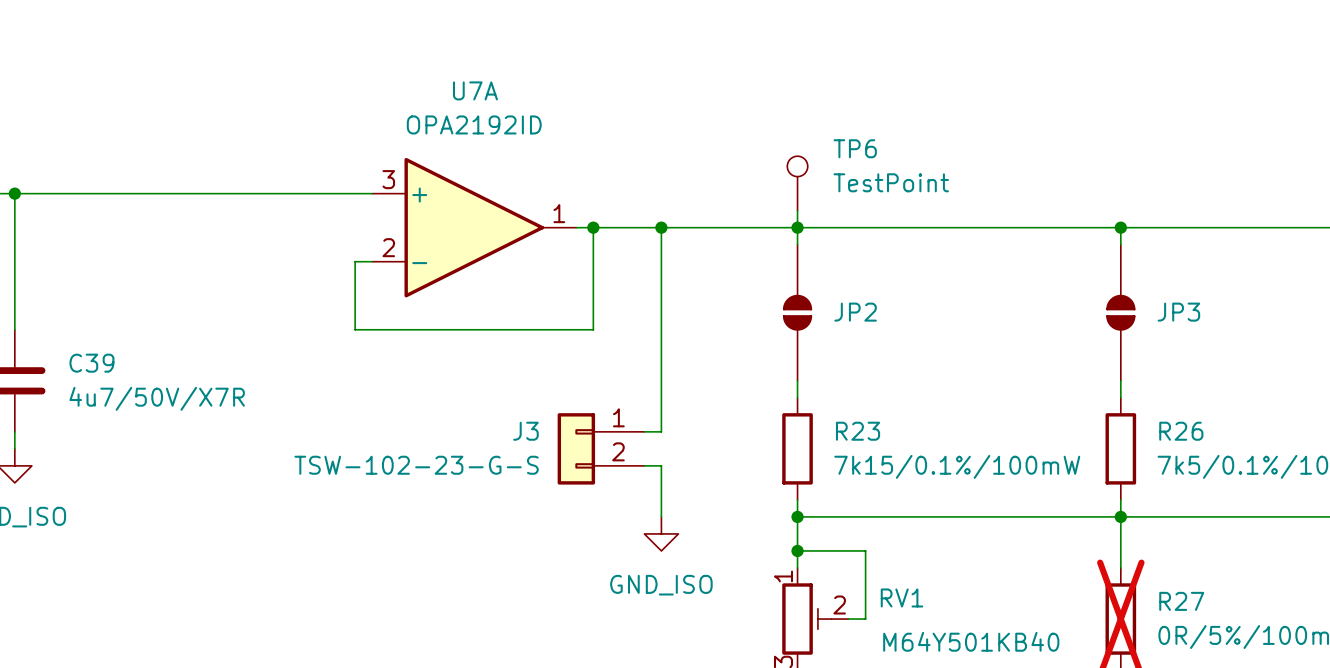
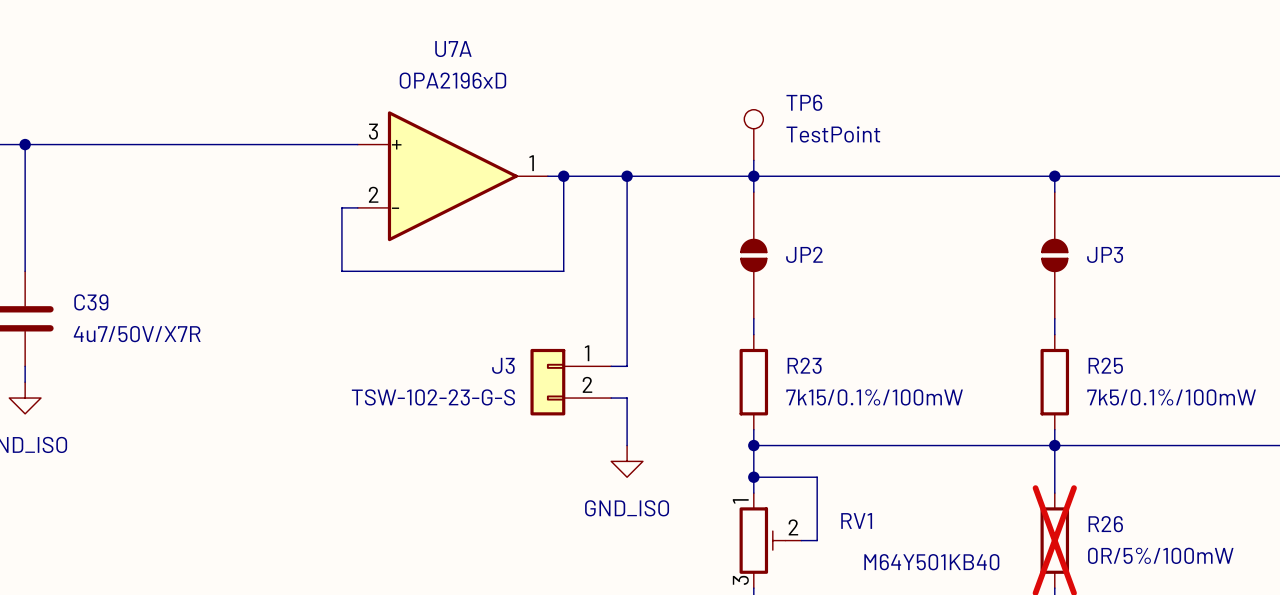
U7A value: OPA2192ID (474, 124) -> OPA2196xD (452, 80)
R26 name: R26 (1181, 431) -> R25 (1105, 365)
R27 name: R27 (1181, 601) -> R26 (1105, 524)

